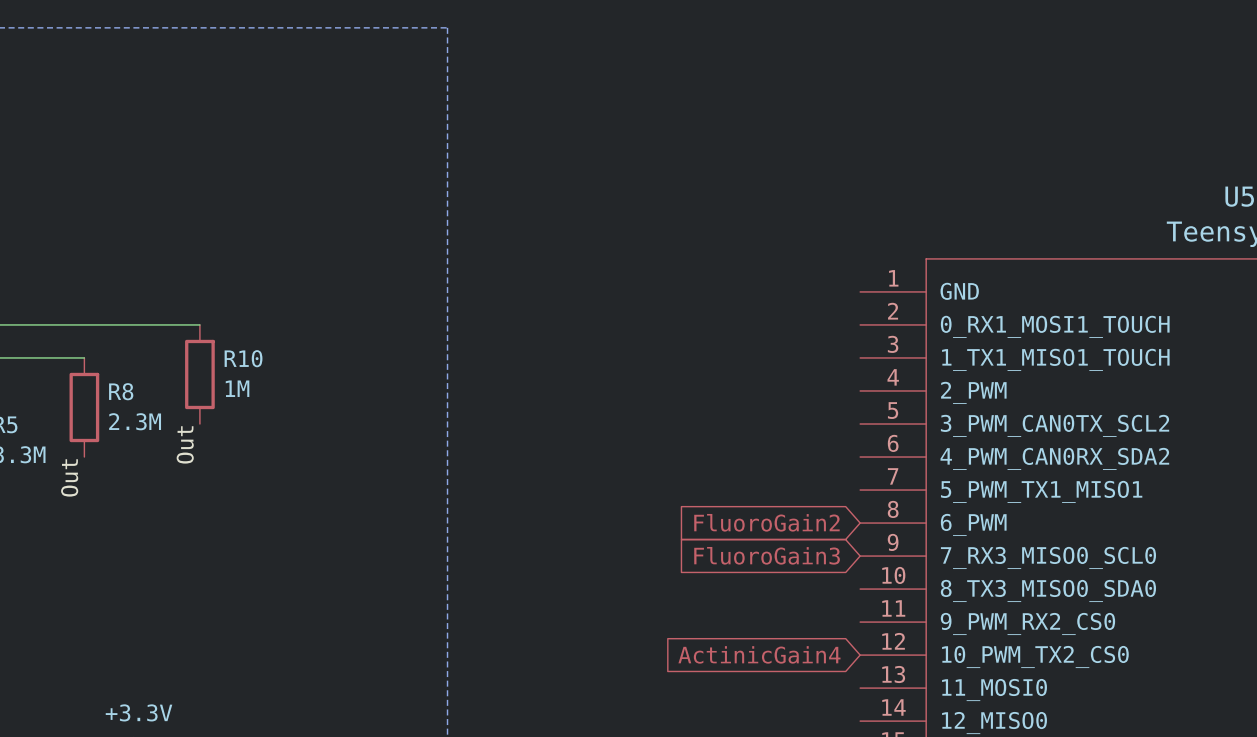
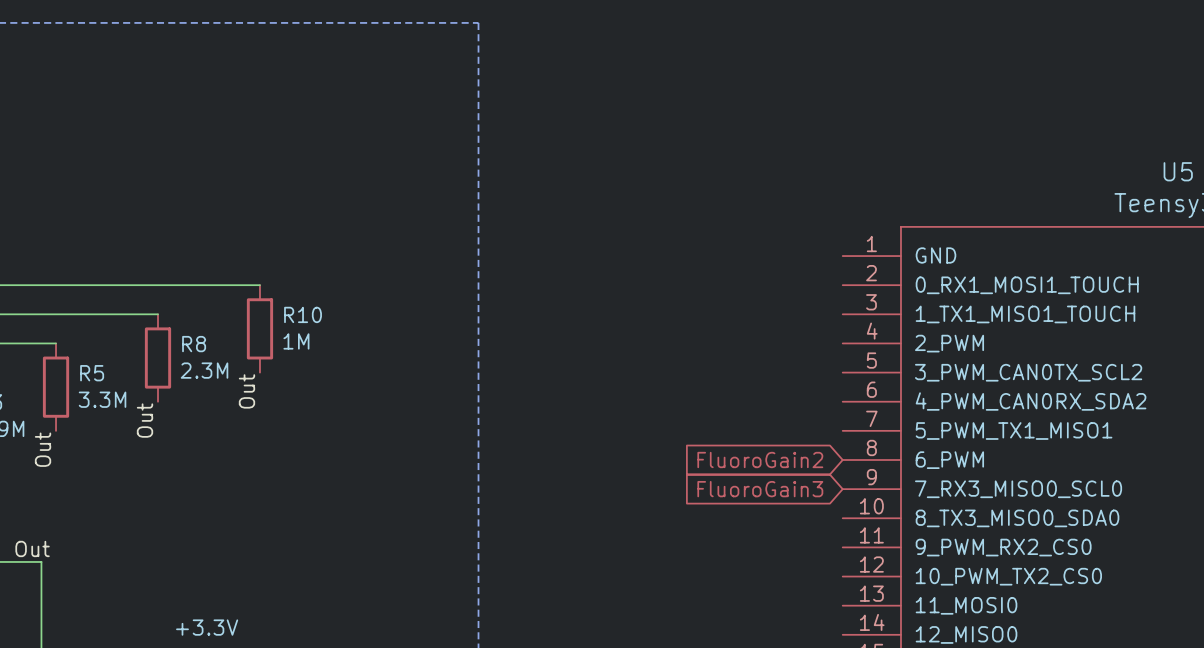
global label: ActinicGain4 (759, 654) -> none

